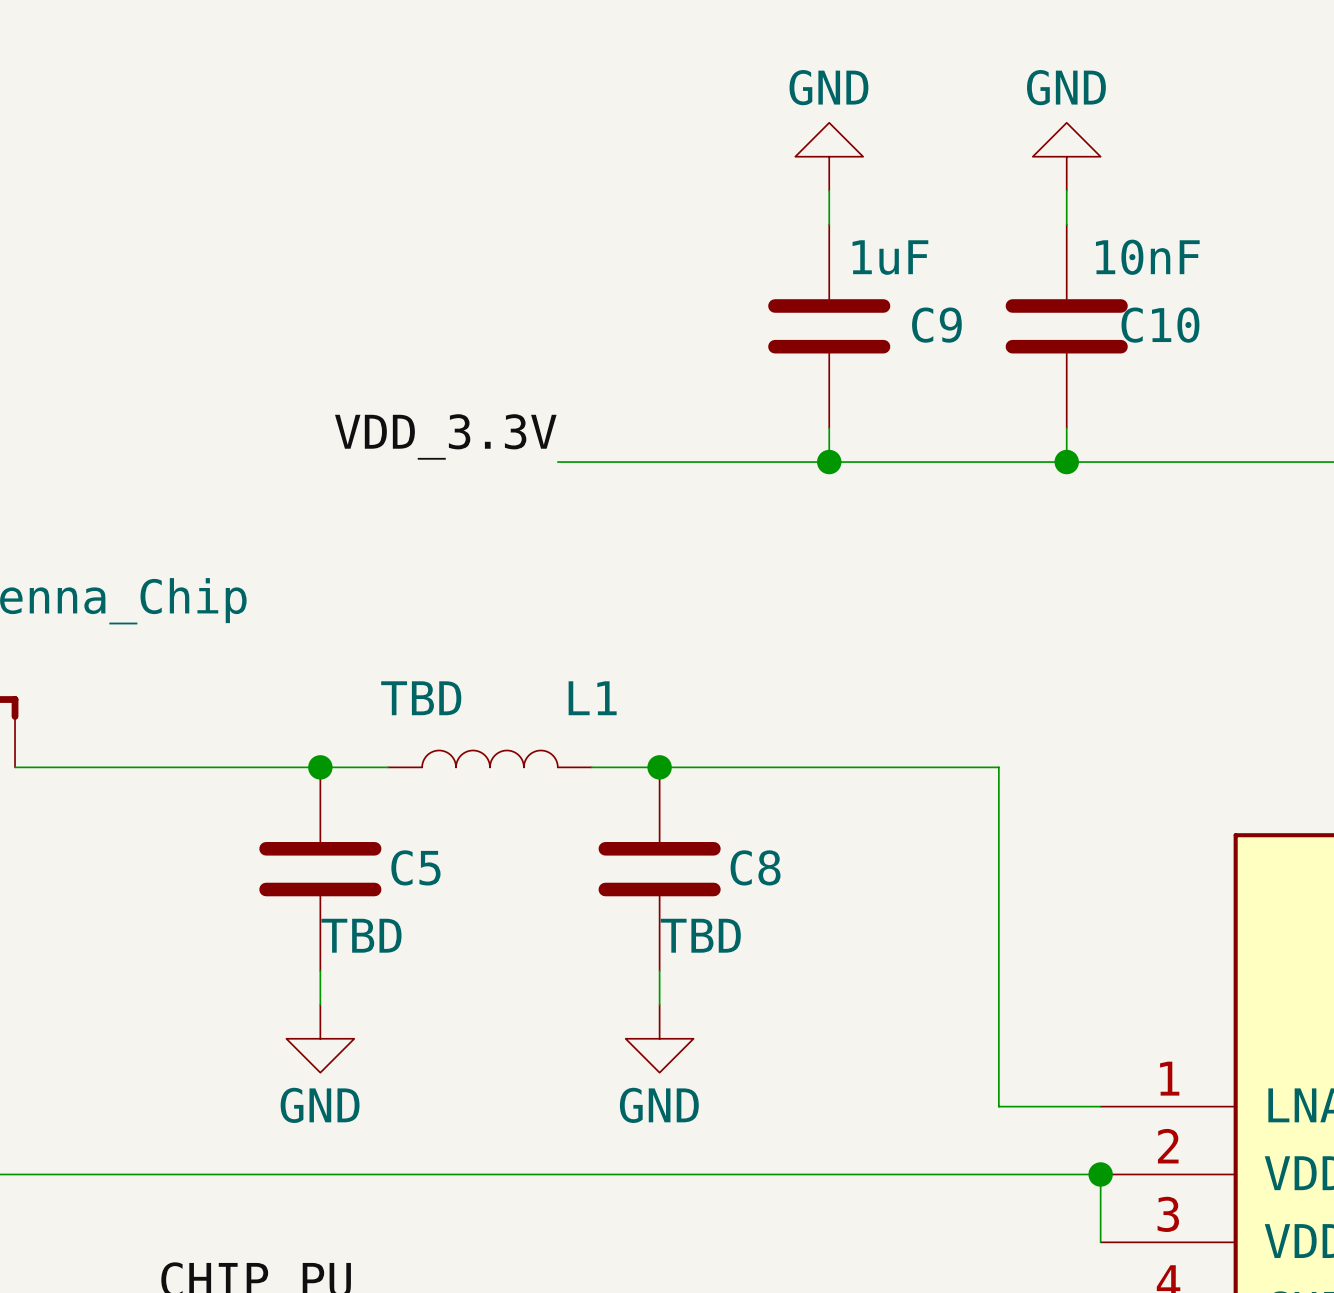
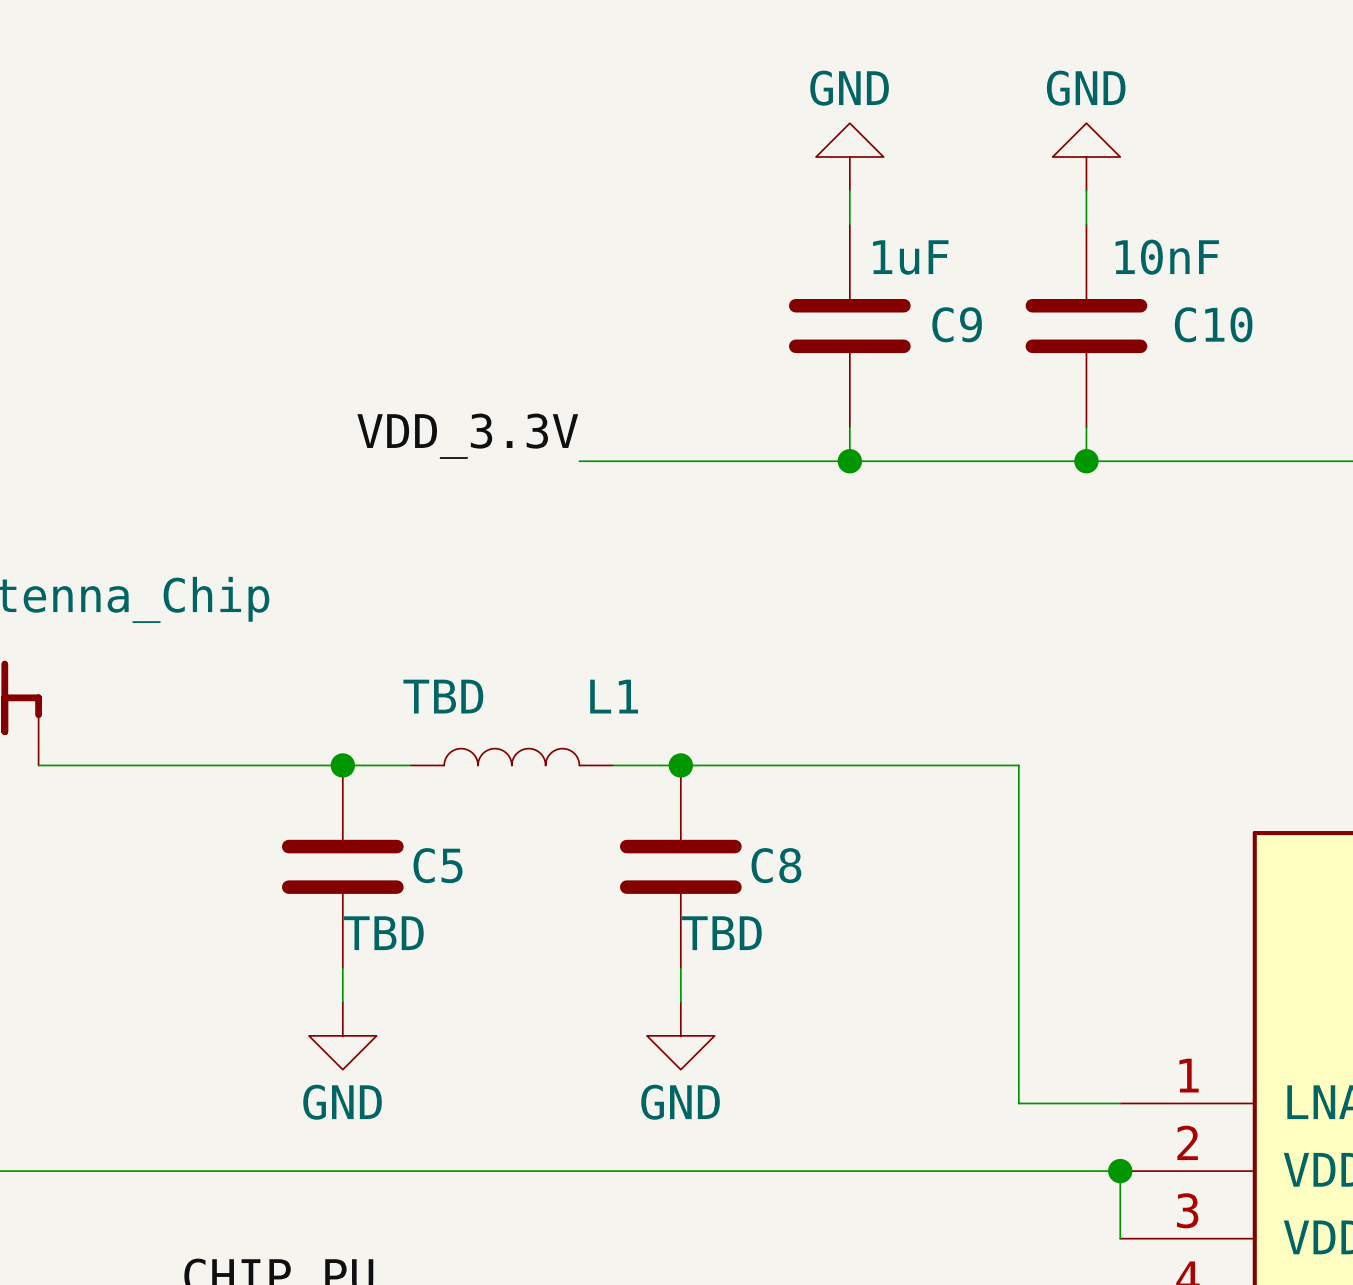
C10 name position: C10 (1160, 325) -> C10 (1213, 324)

